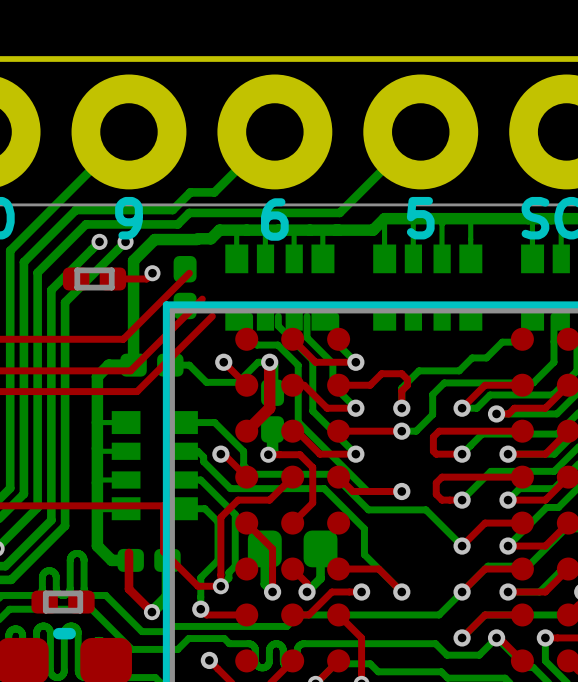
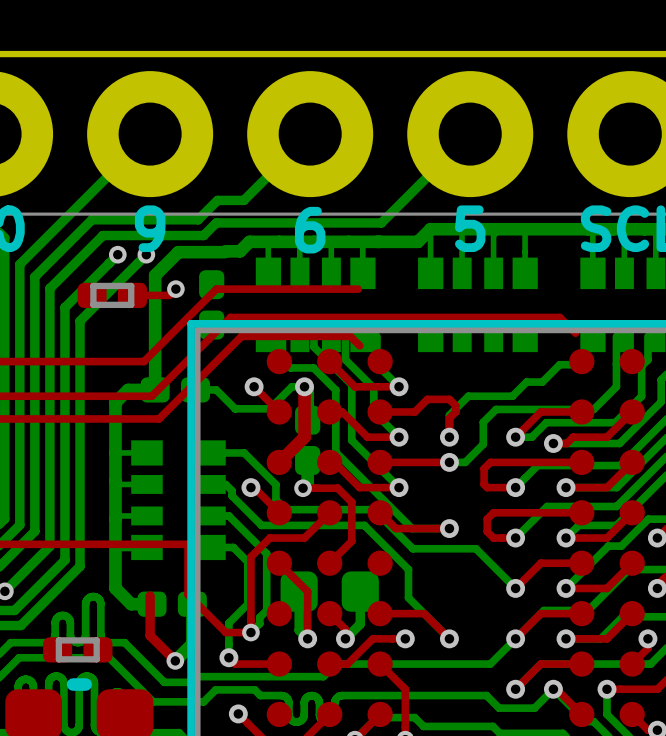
top track: none -> (216, 289) (358, 289)
top track: none -> (230, 317) (559, 317) (575, 333)
top track: none -> (241, 336) (350, 336) (359, 345)

